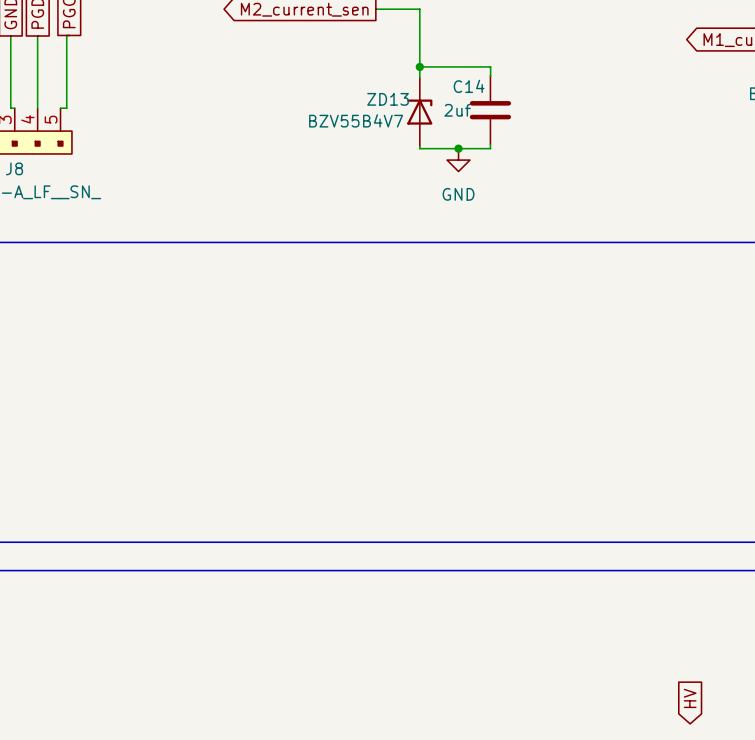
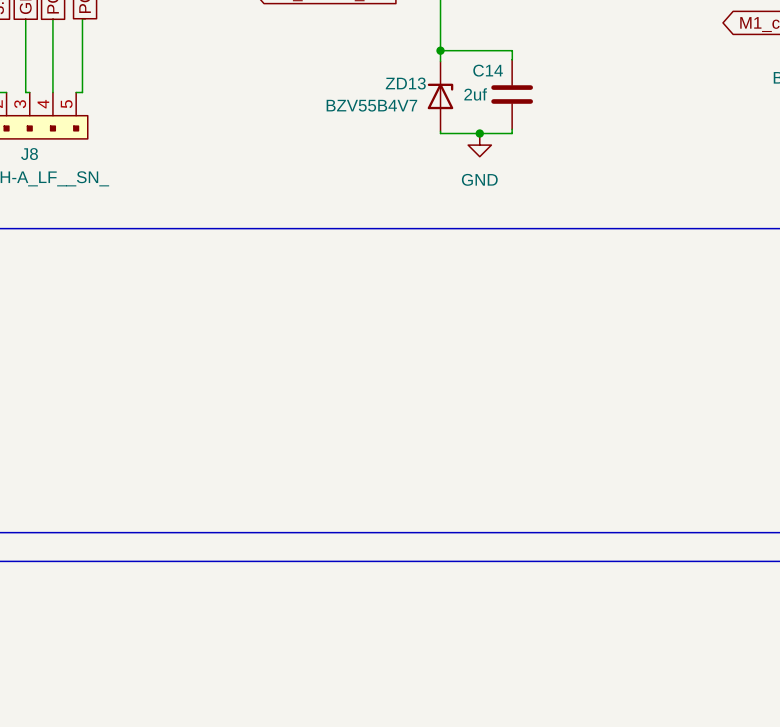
global label: HV (690, 698) -> none

